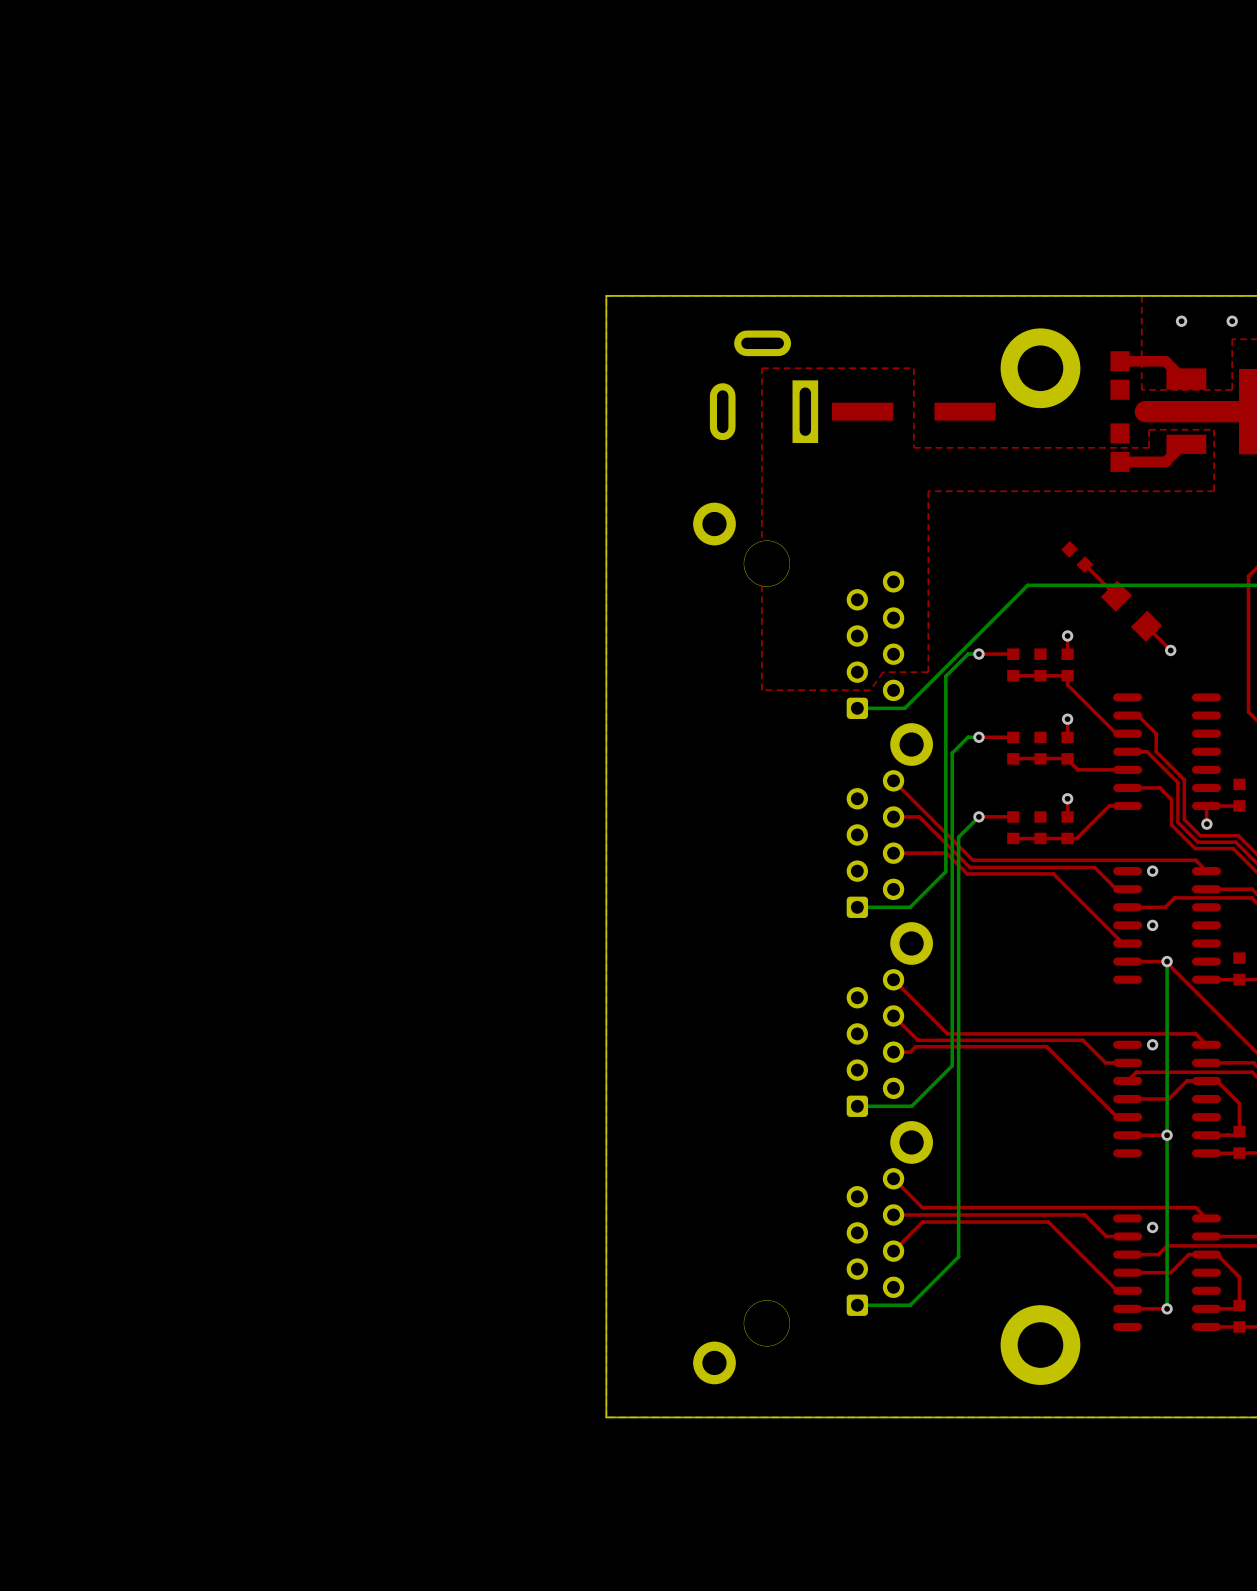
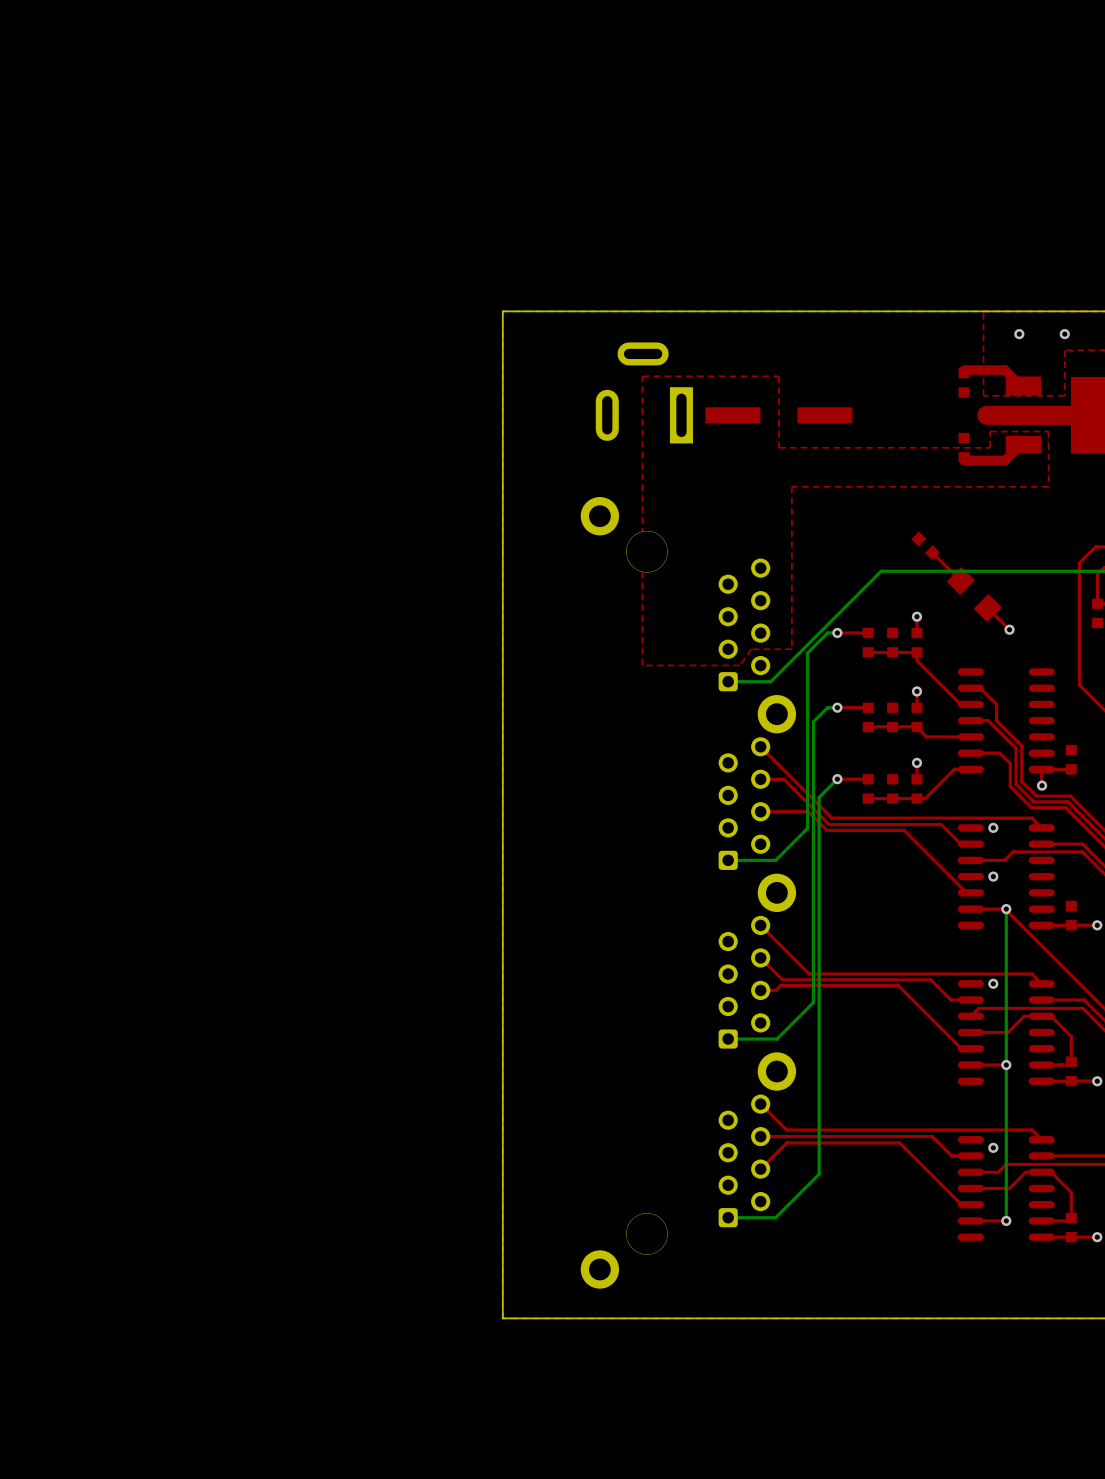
part footprint: [1110, 351, 1130, 400] -> [958, 368, 970, 398]
part: (1040, 368) -> none
part footprint: [1110, 423, 1130, 472] -> [958, 432, 970, 463]
part: (1040, 1345) -> none

